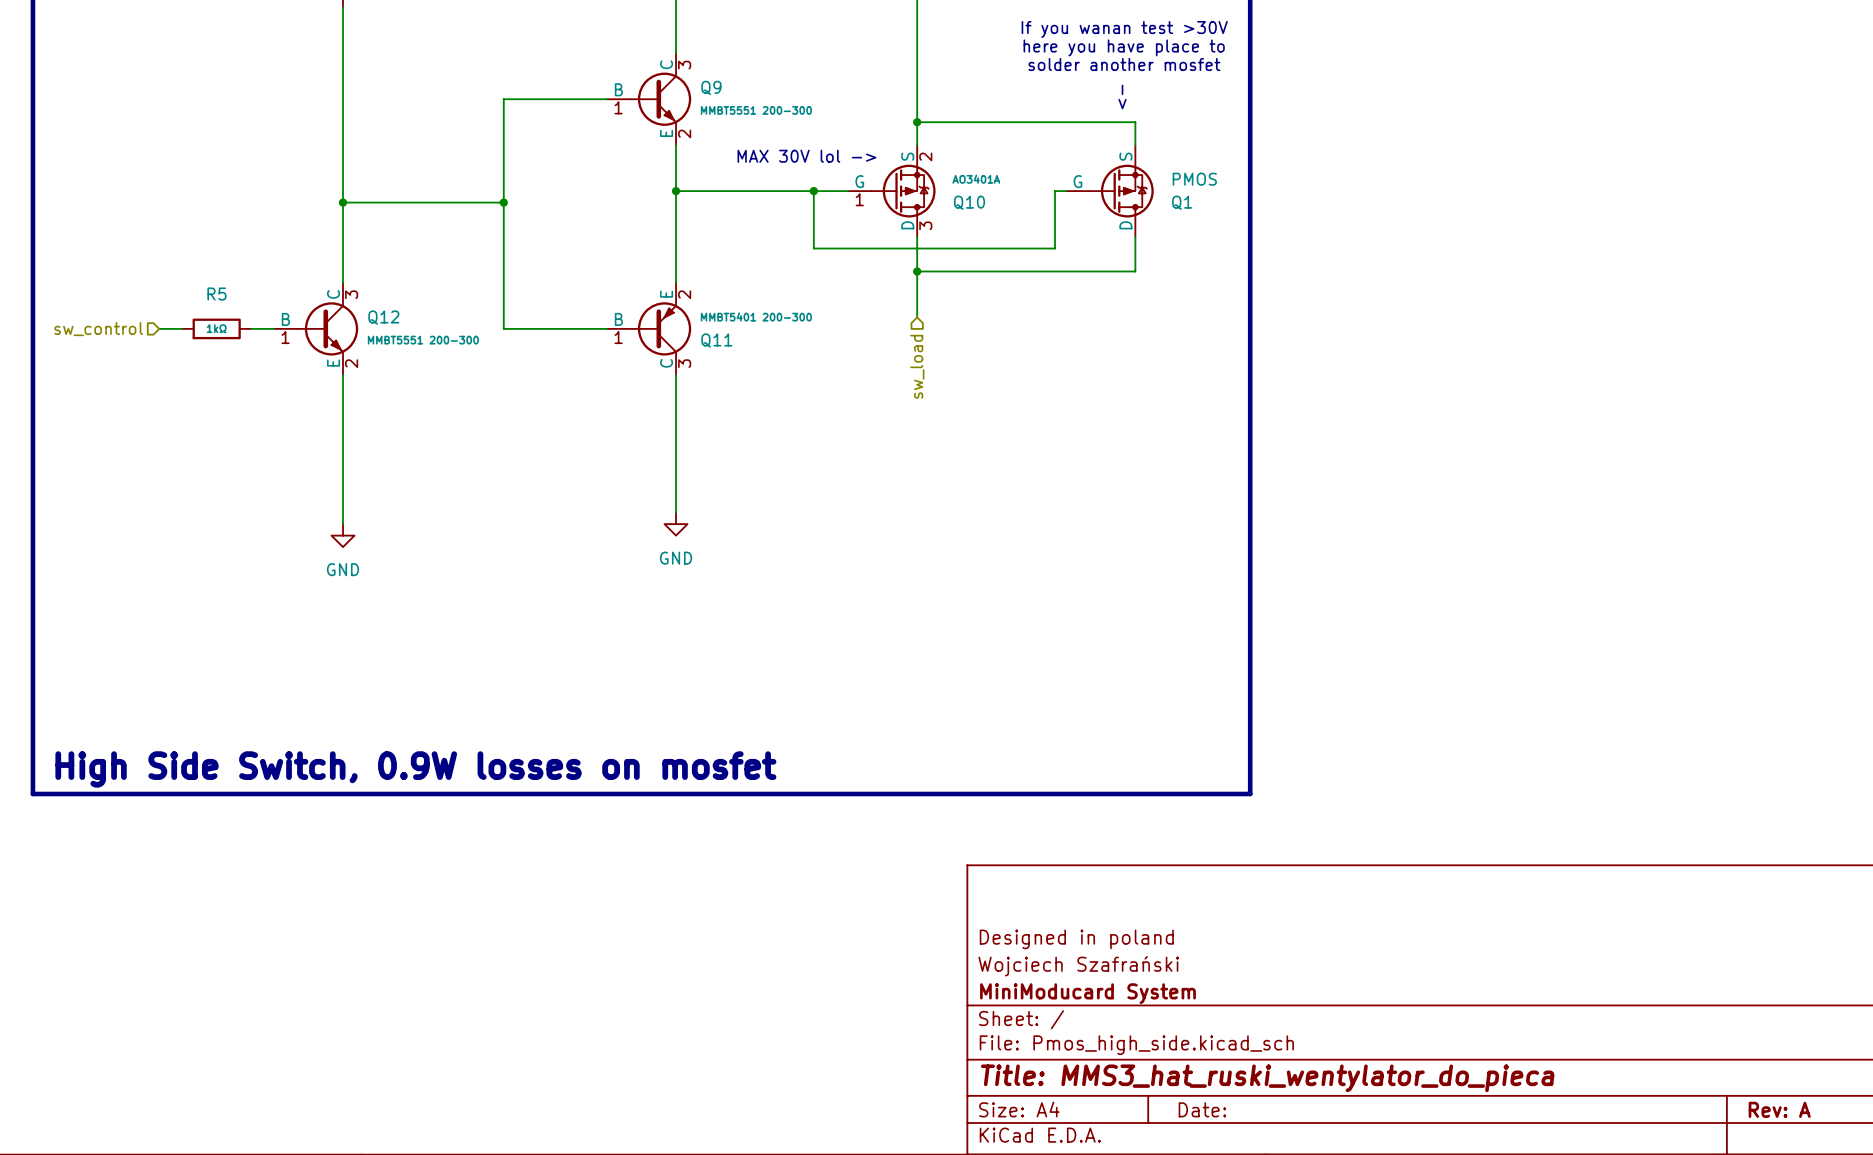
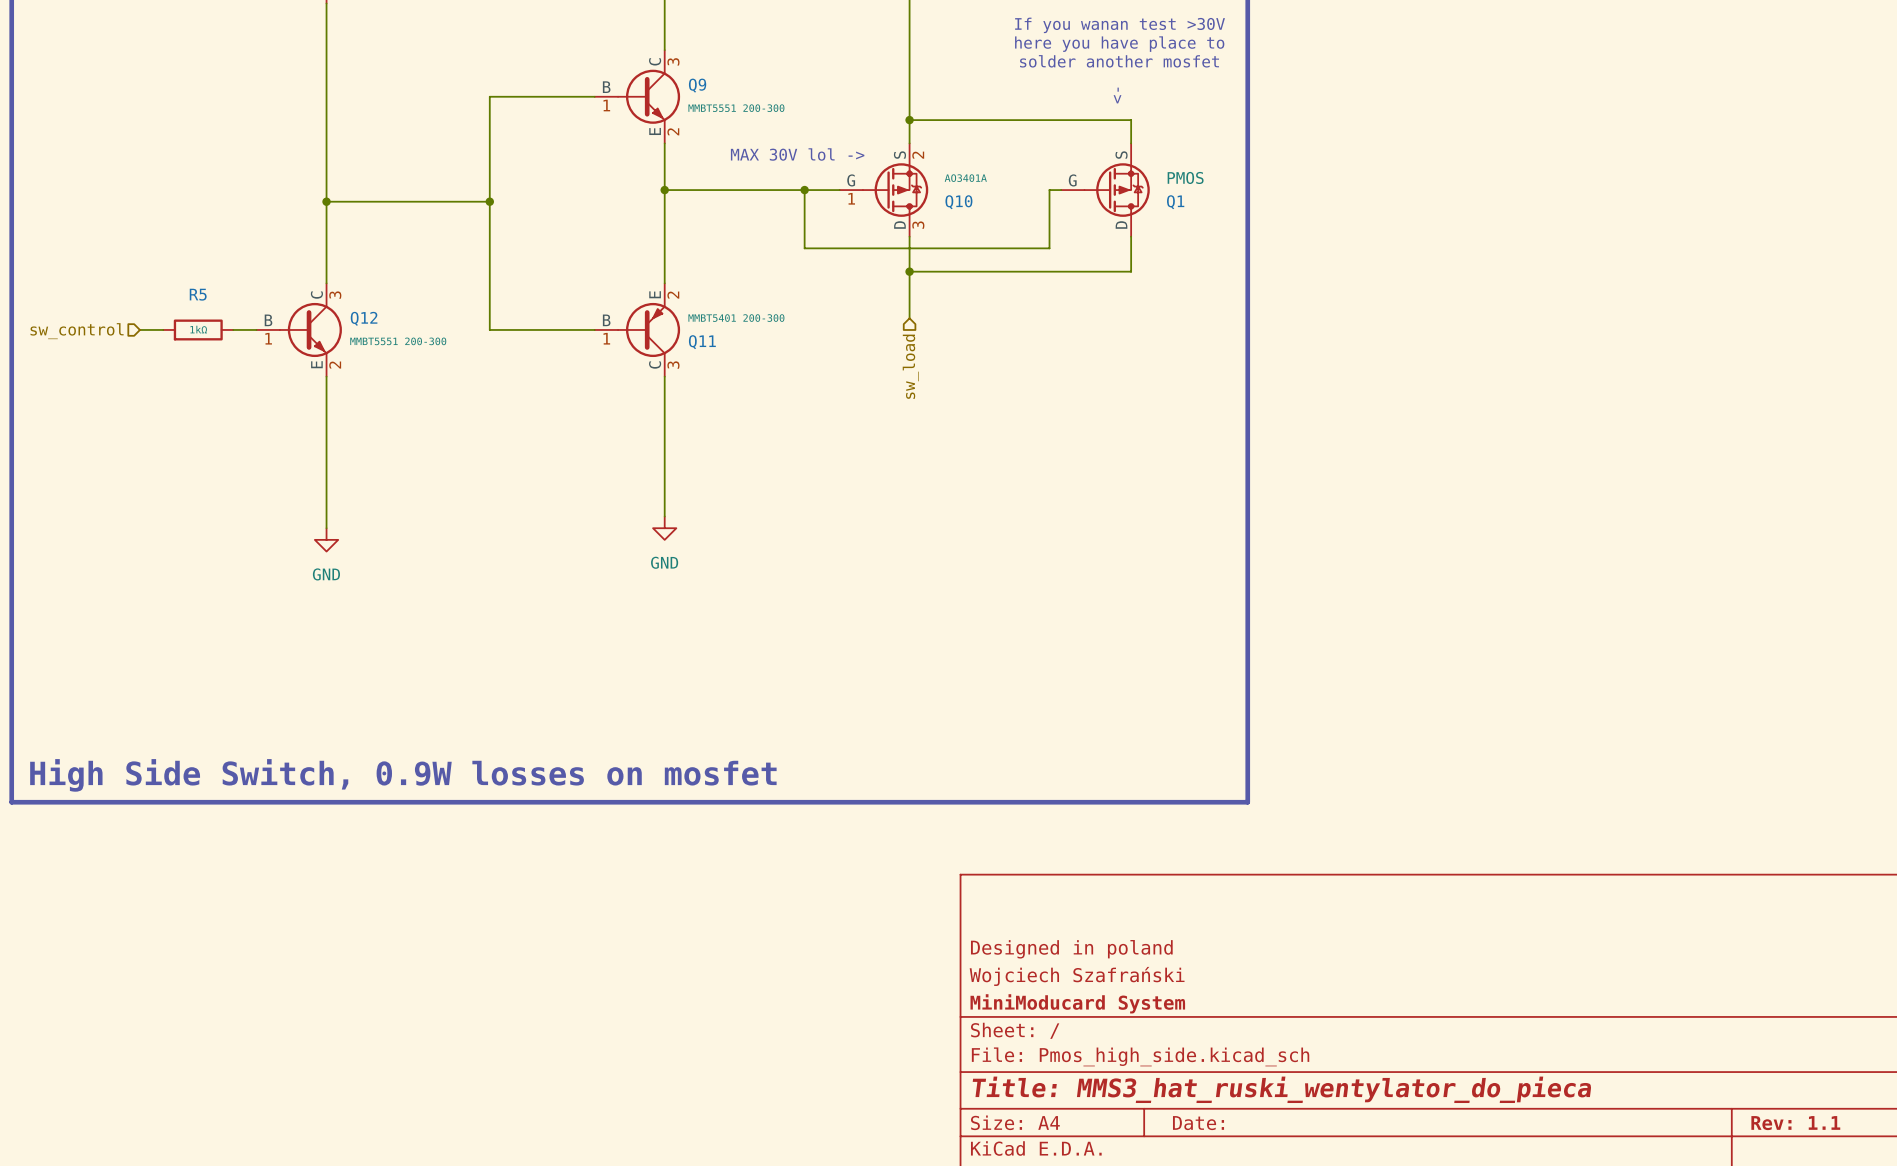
title block: Rev: A (1779, 1109) -> Rev: 1.1 (1795, 1123)

